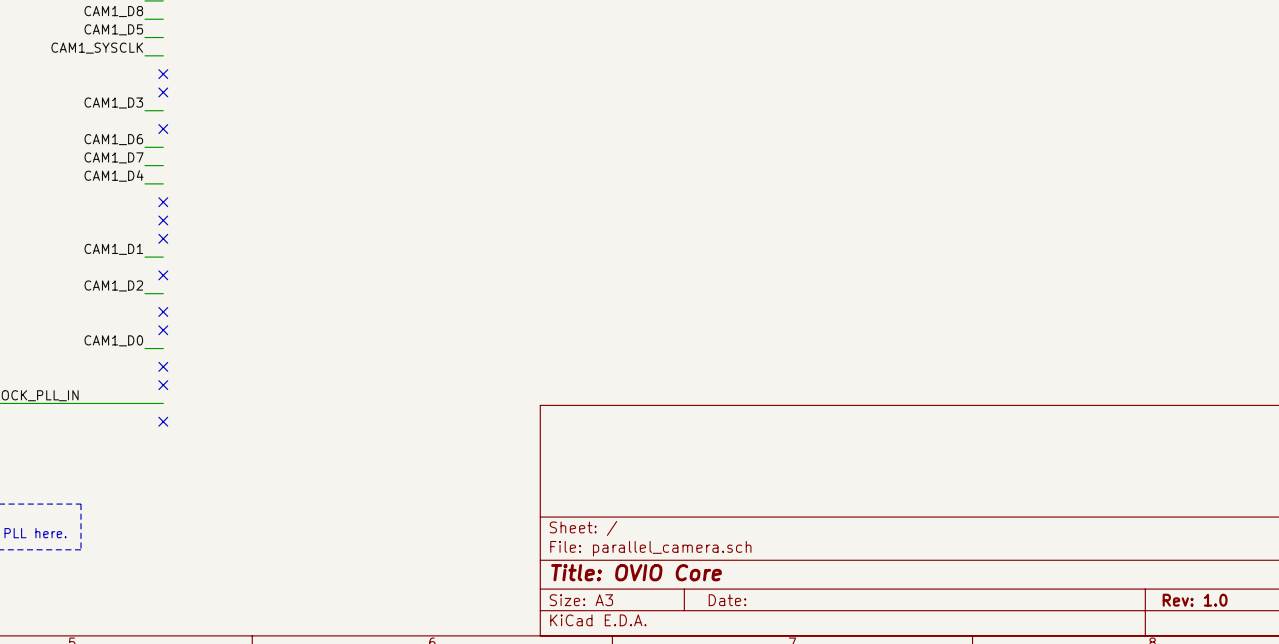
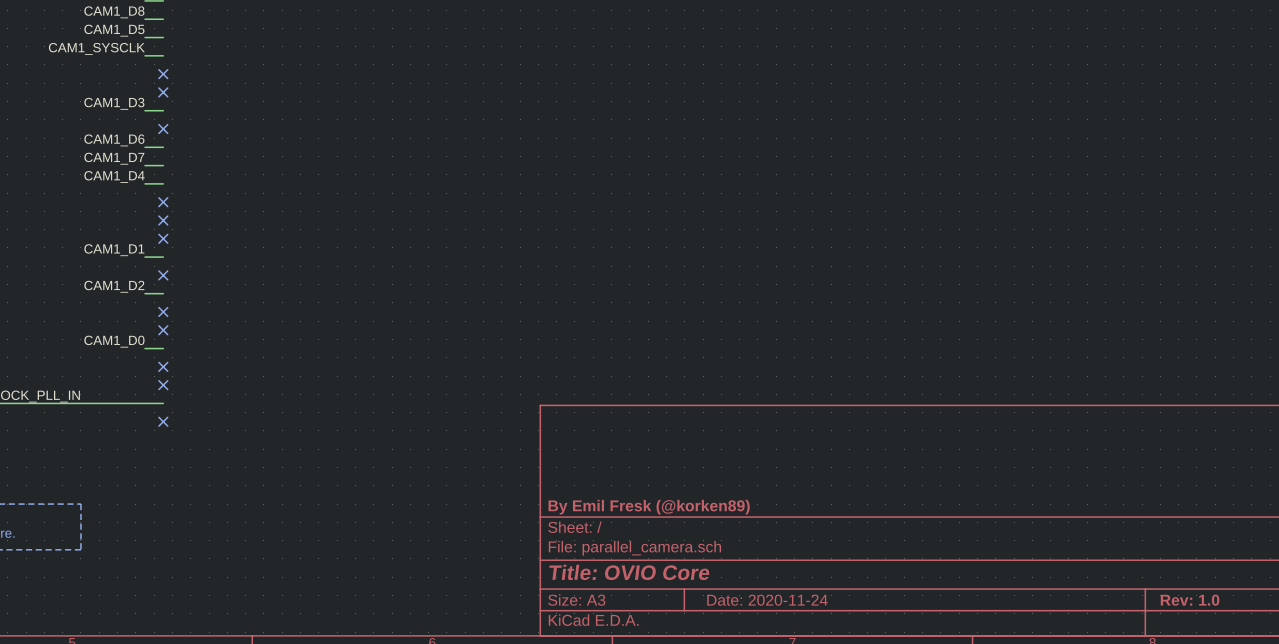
title block: none -> By Emil Fresk (@korken89) (649, 507)
title block: Date: (727, 600) -> Date: 2020-11-24 (767, 600)

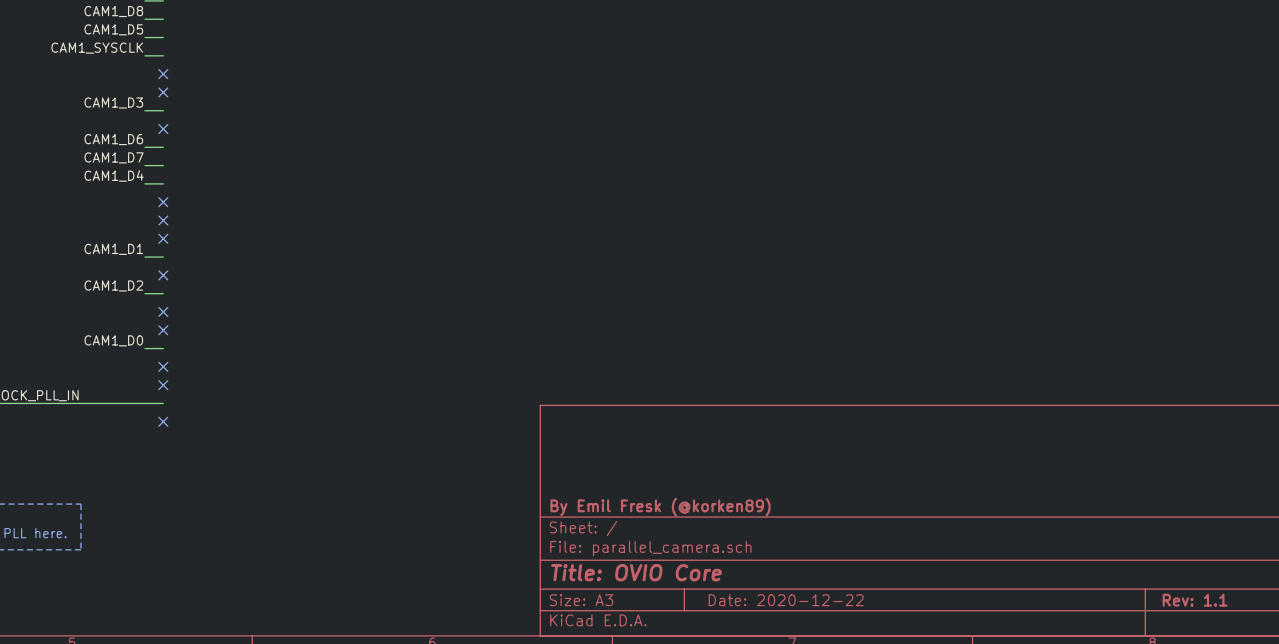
title block: Date: 2020-11-24 (767, 600) -> Date: 2020-12-22 (786, 600)
title block: Rev: 1.0 (1190, 600) -> Rev: 1.1 (1195, 600)

